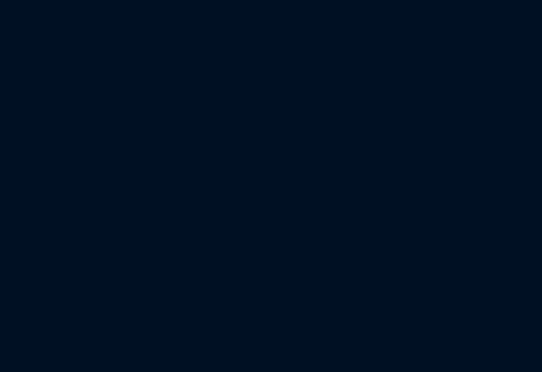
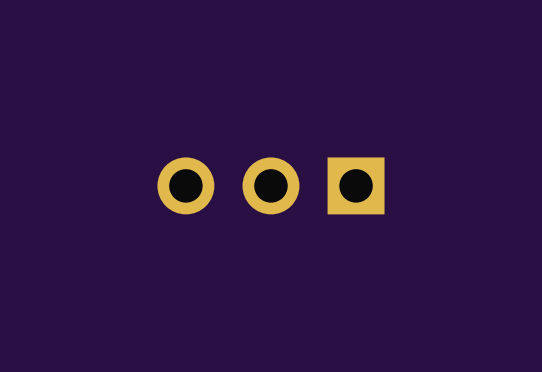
part: none -> (270, 185)

